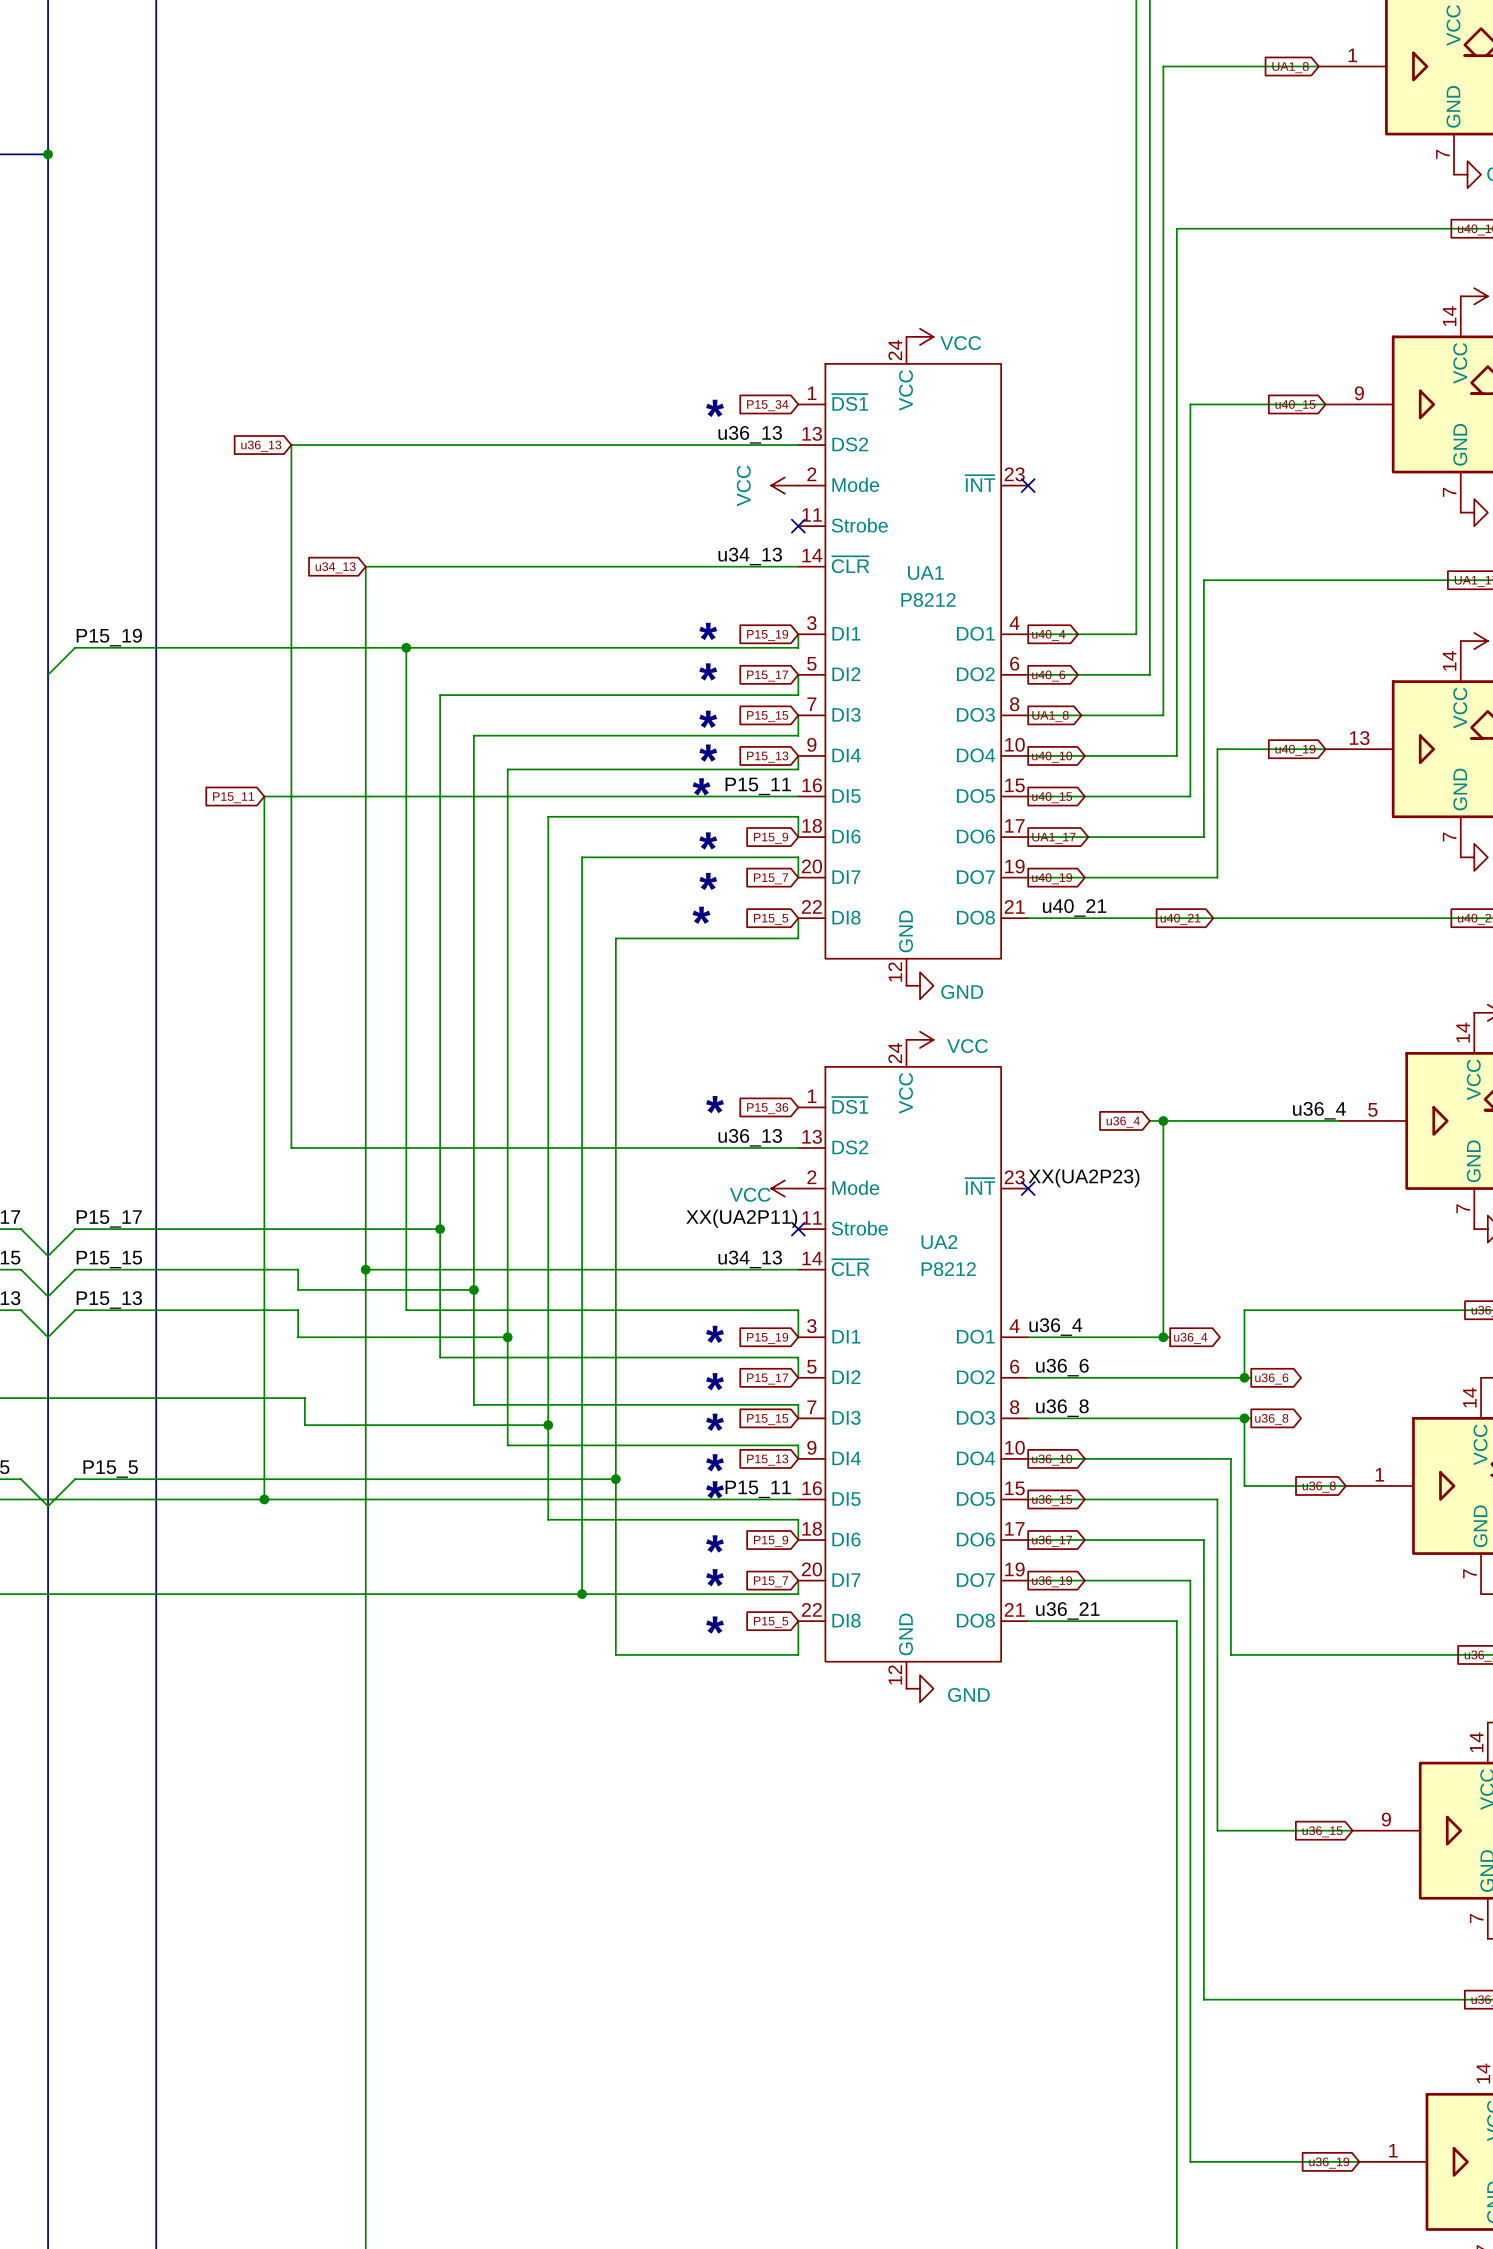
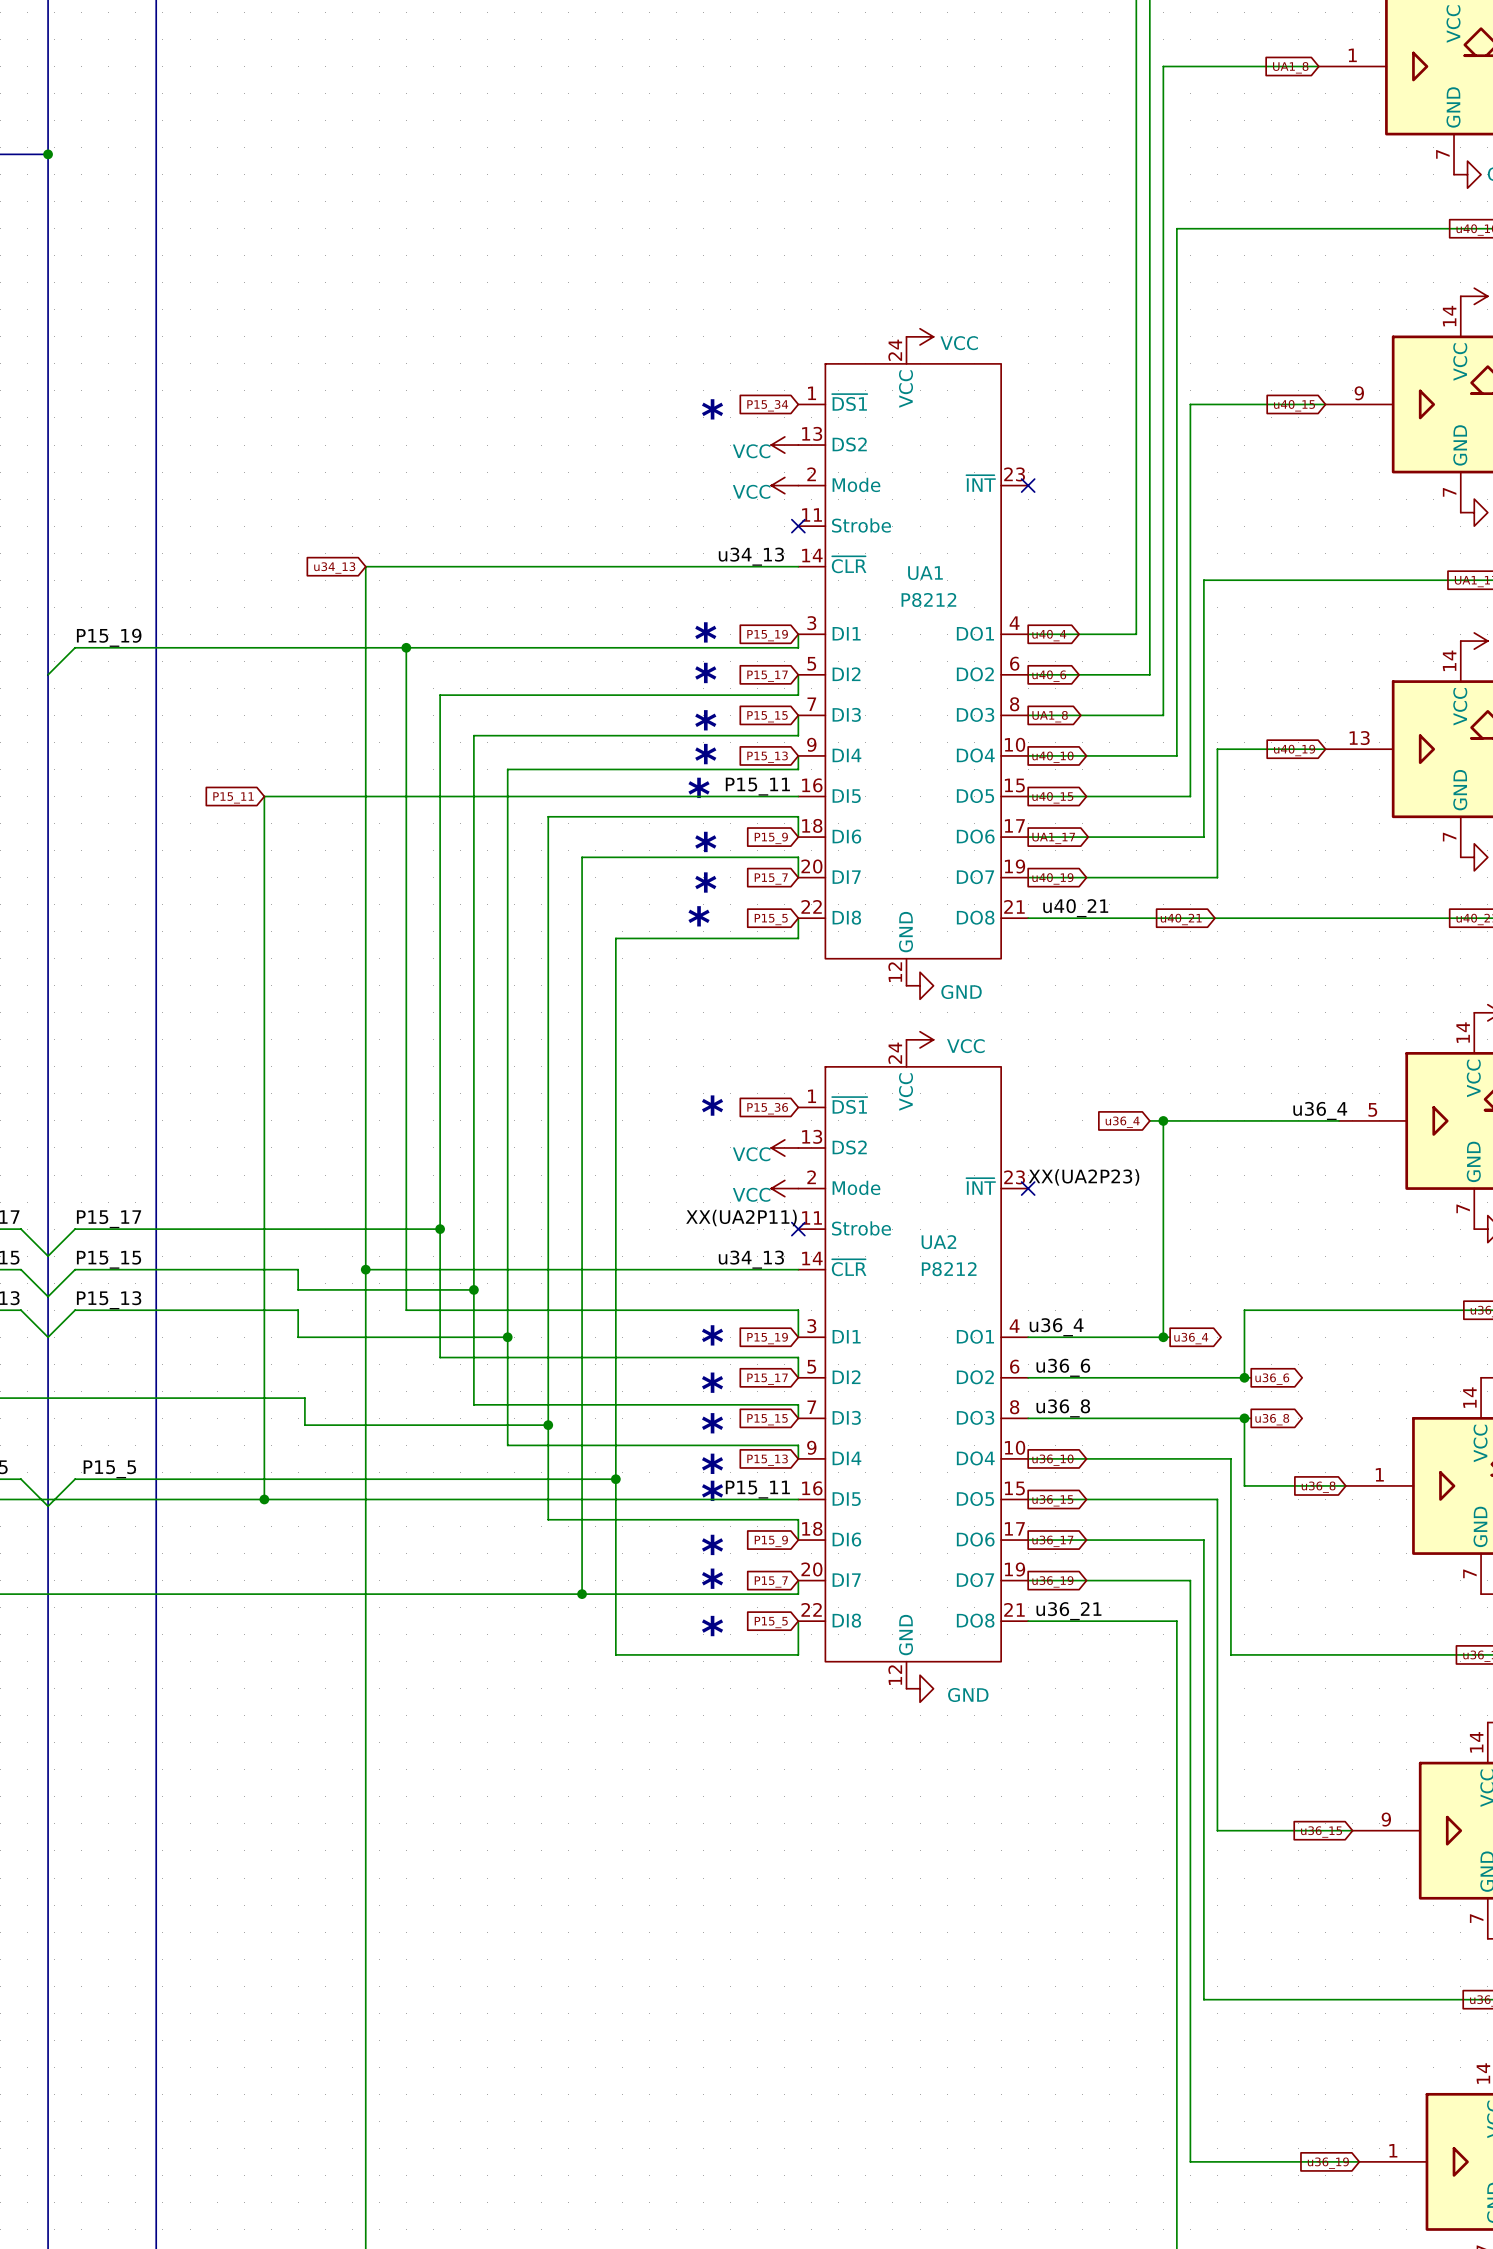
label: u36_13 (750, 434) -> none
power symbol: none -> VCC (784, 445)
wire: (798, 445) (291, 445) (291, 1147) (798, 1147) -> none
global label: u36_13 (261, 446) -> none
power symbol text rotation: 0° (743, 485) -> 90° clockwise (751, 491)
label: u36_13 (750, 1137) -> none
power symbol: none -> VCC (784, 1147)

